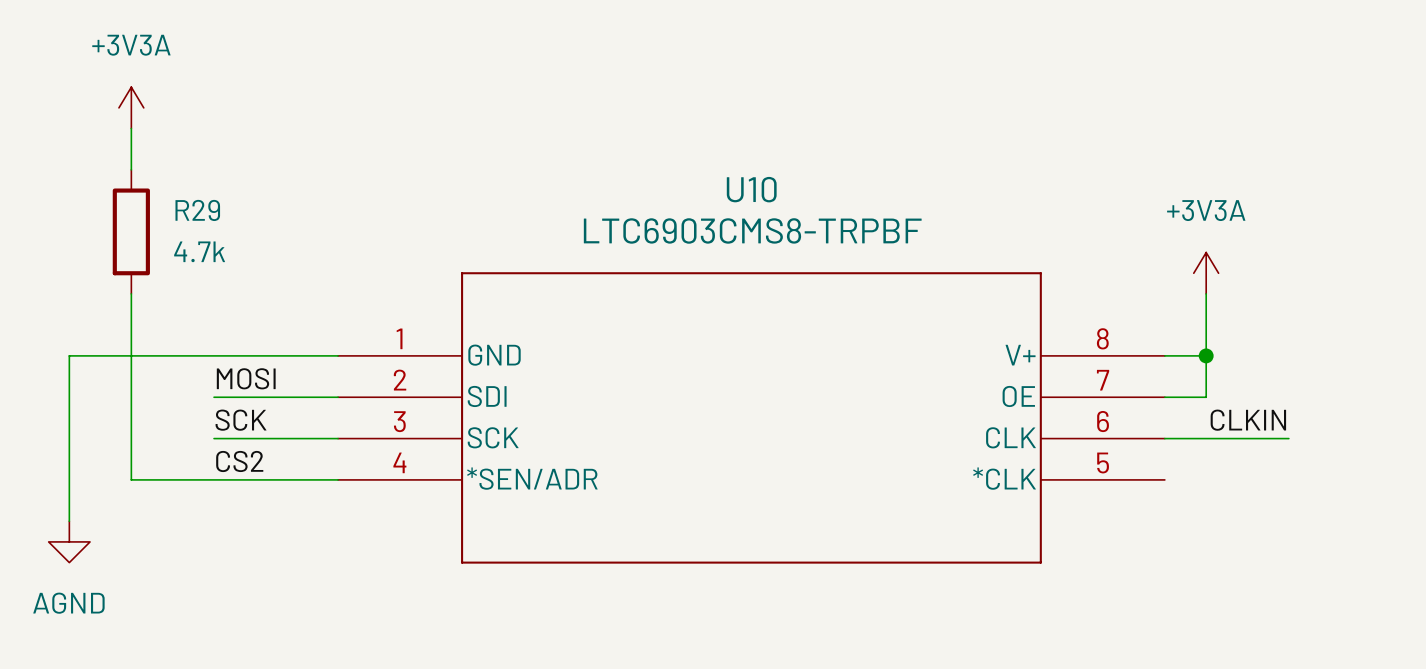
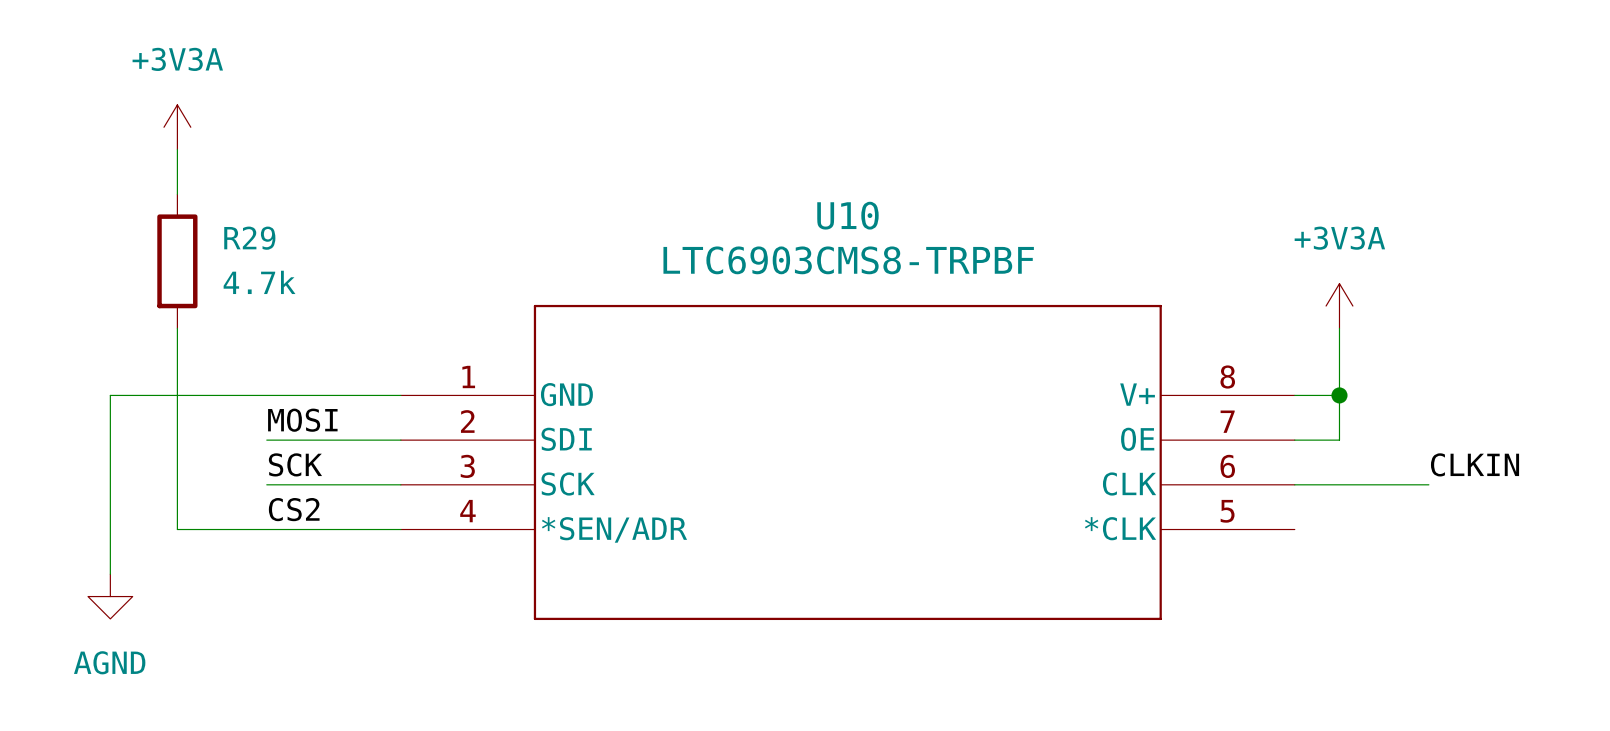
label position: CLKIN (1248, 420) -> CLKIN (1475, 464)

